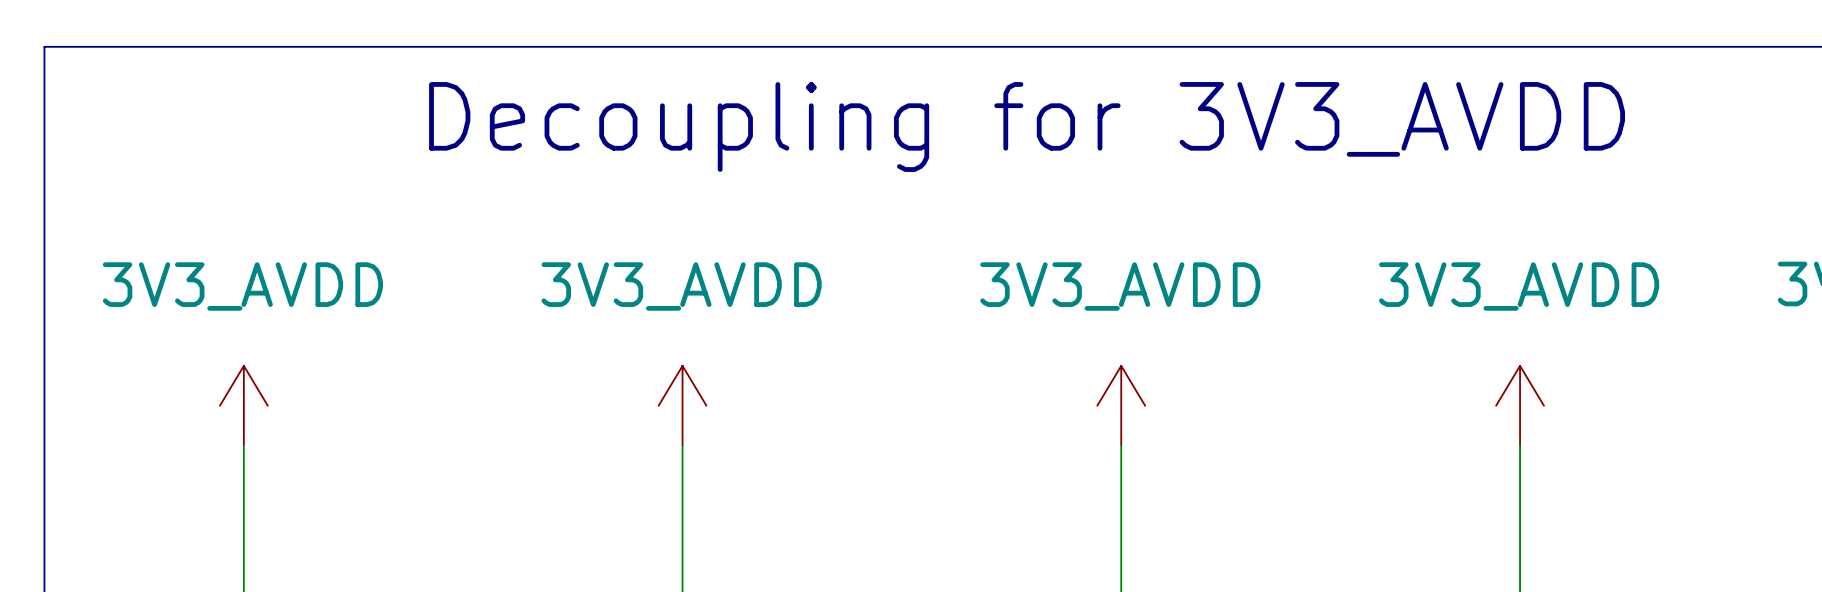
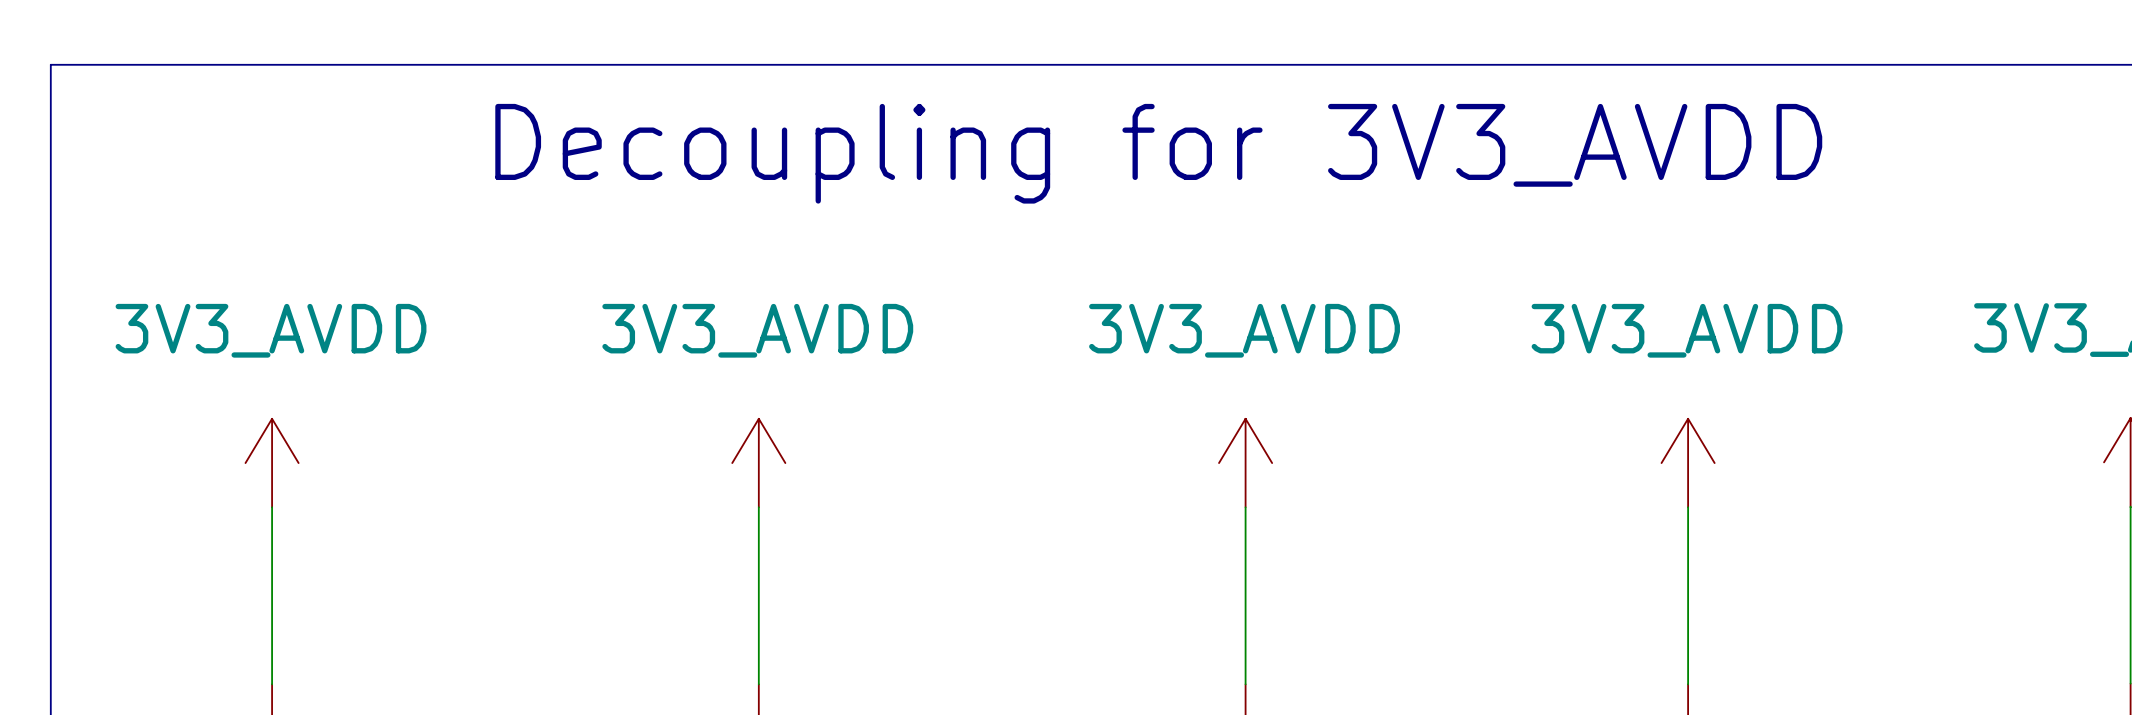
text position: Decoupling for 3V3_AVDD (1027, 126) -> Decoupling for 3V3_AVDD (1158, 153)

